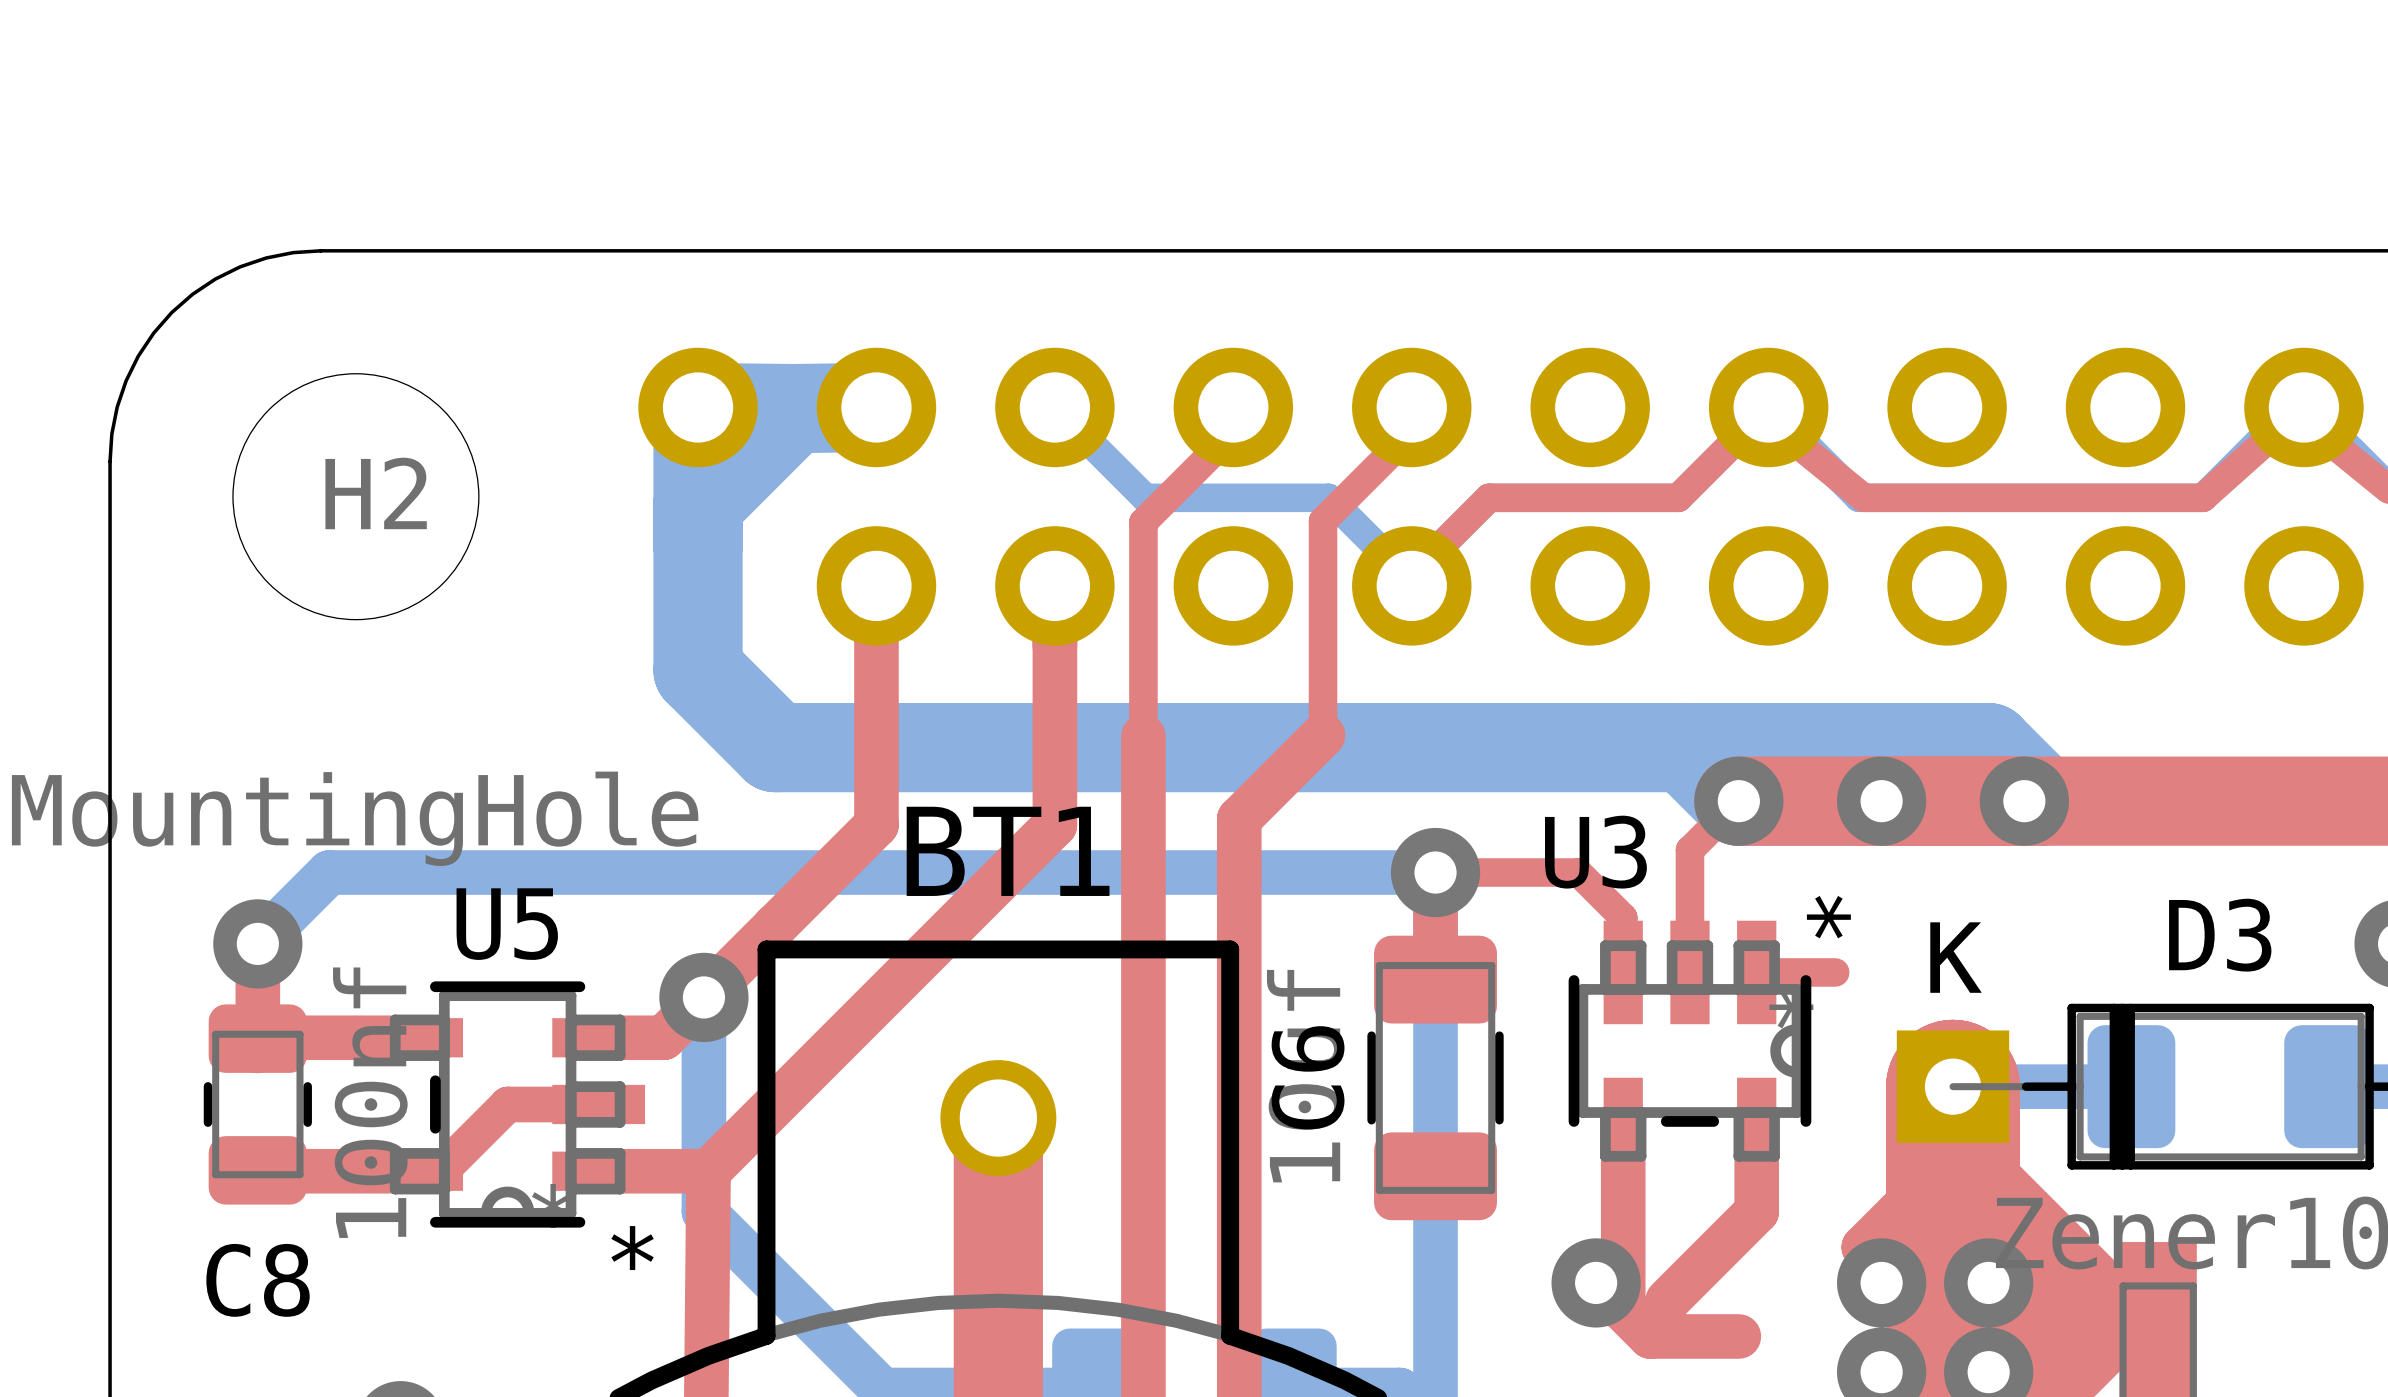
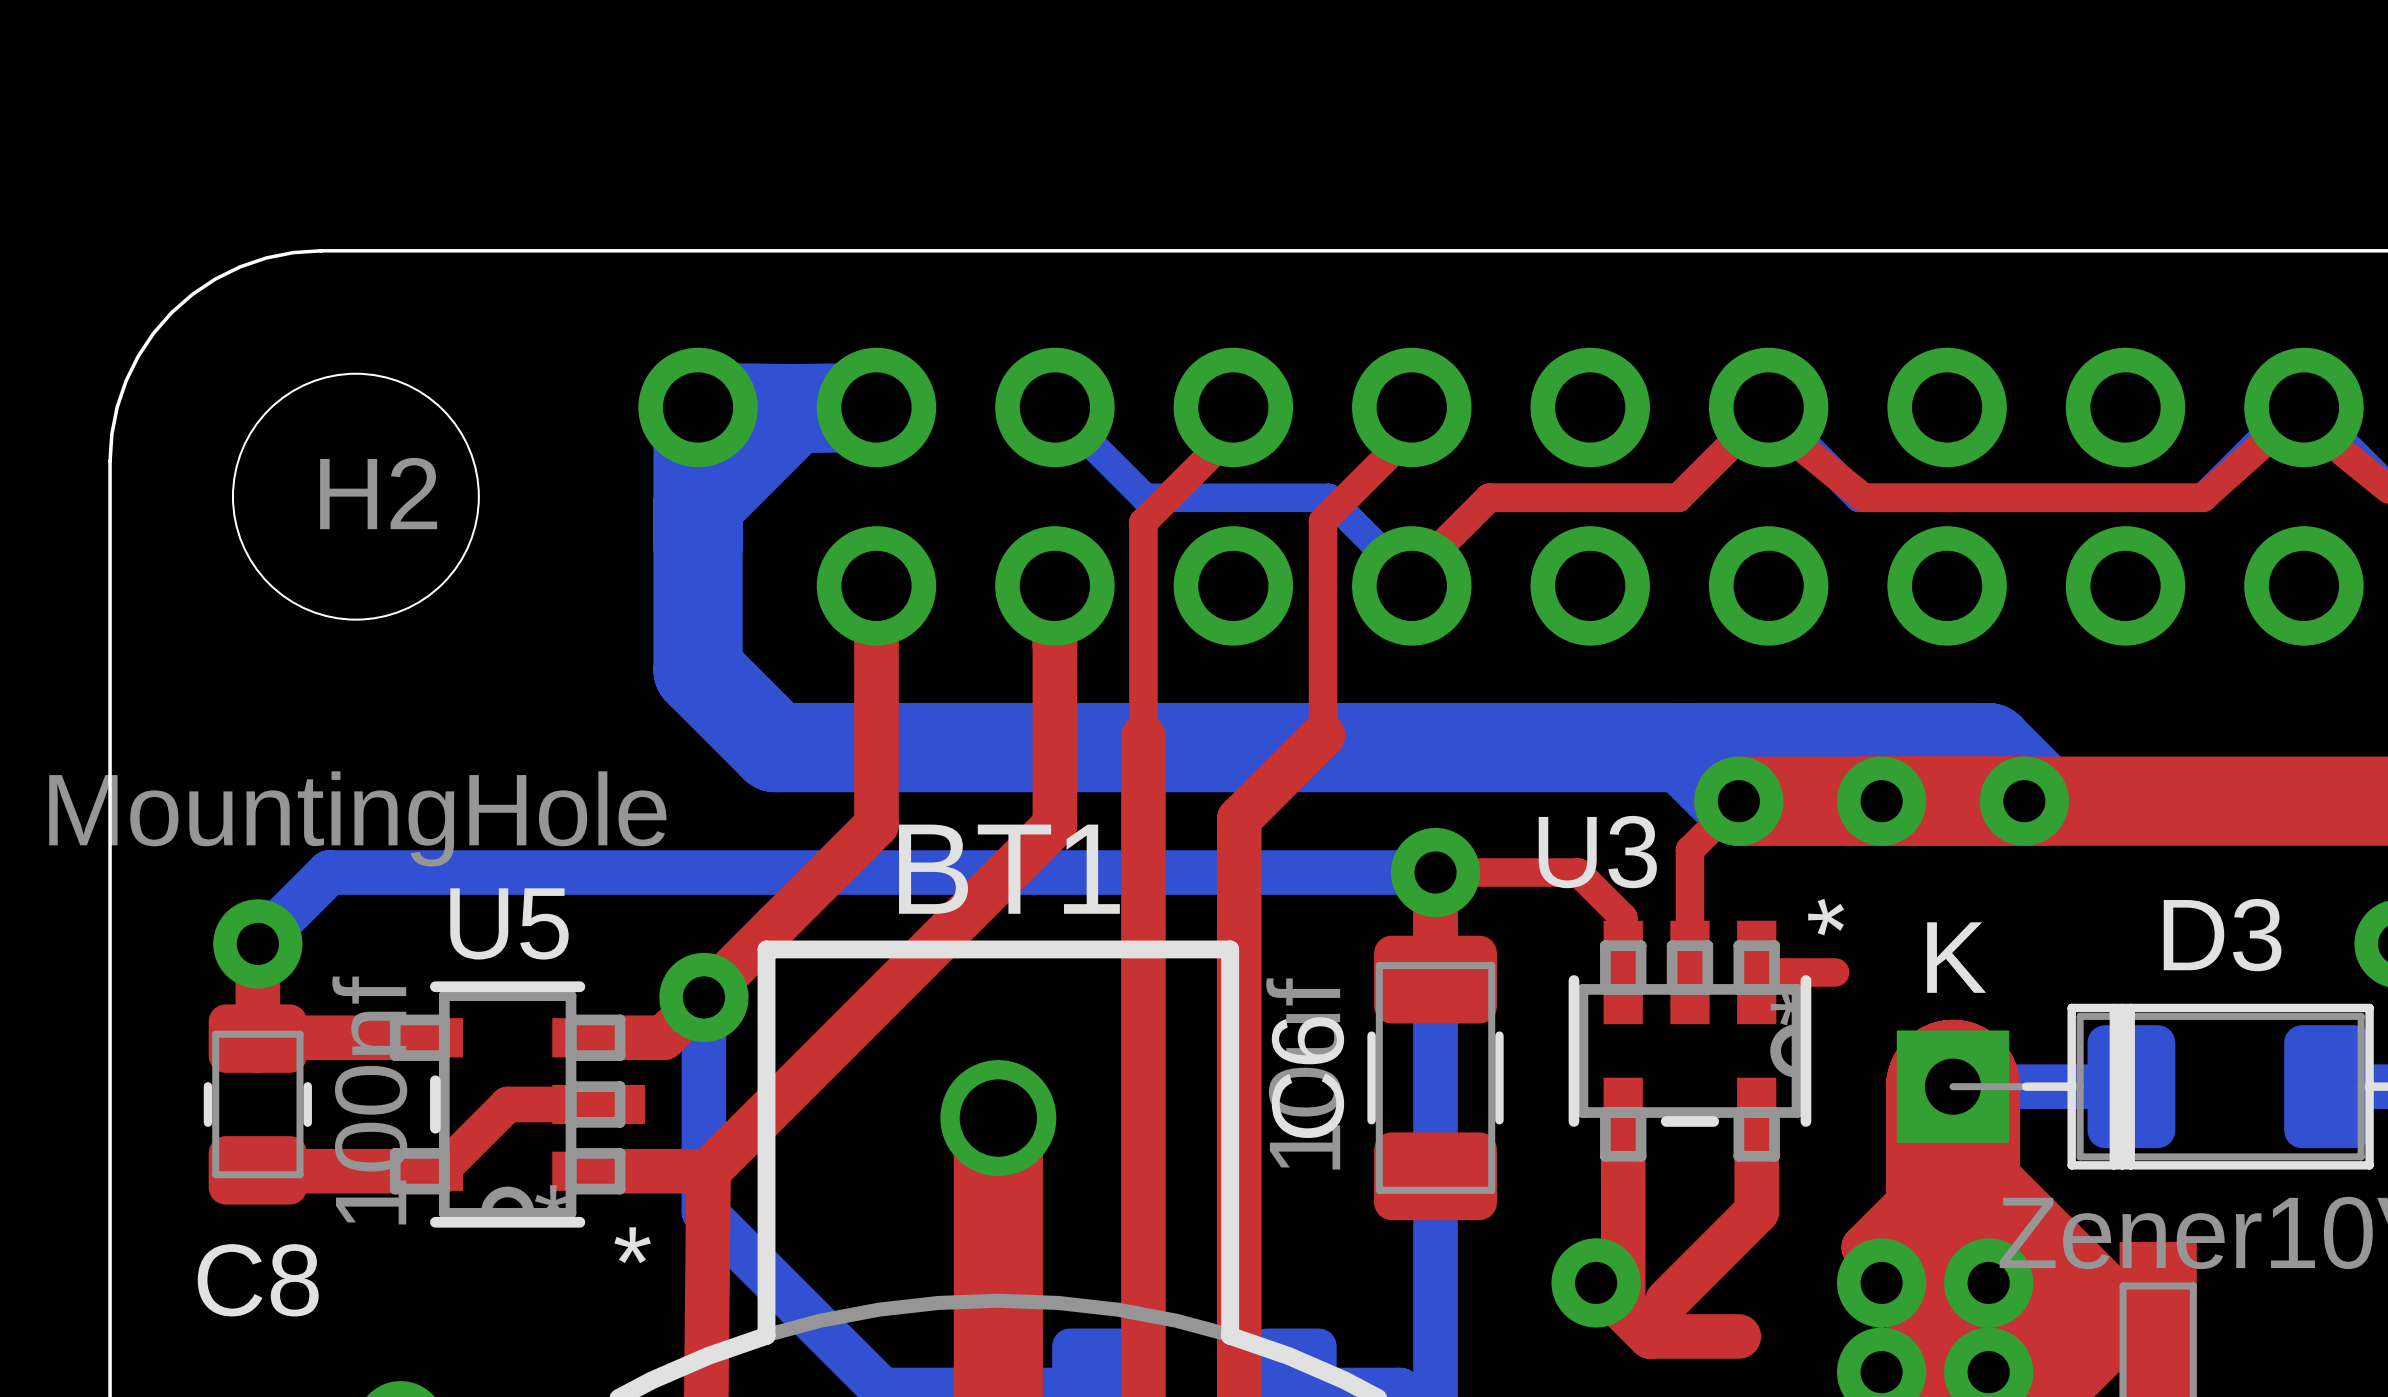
BT1 name position: BT1 (1008, 851) -> BT1 (1009, 869)

